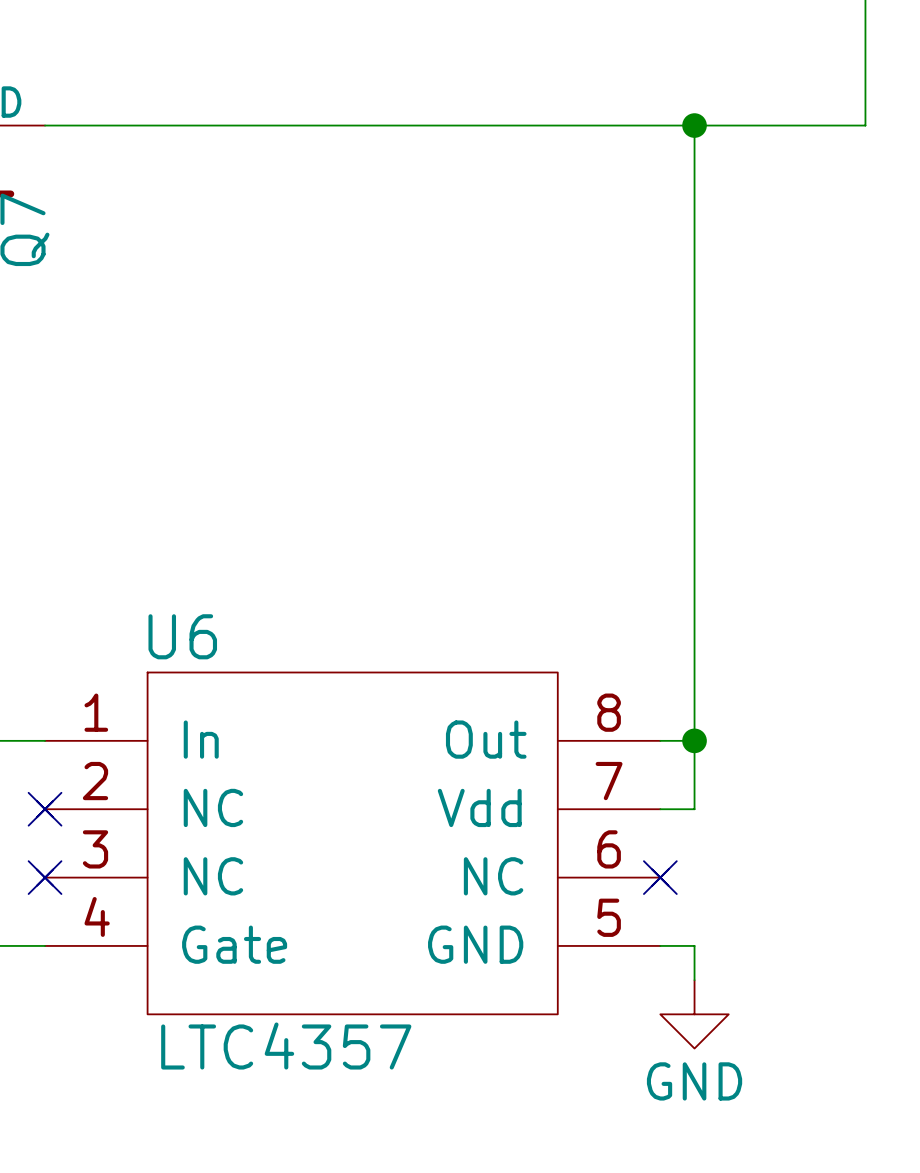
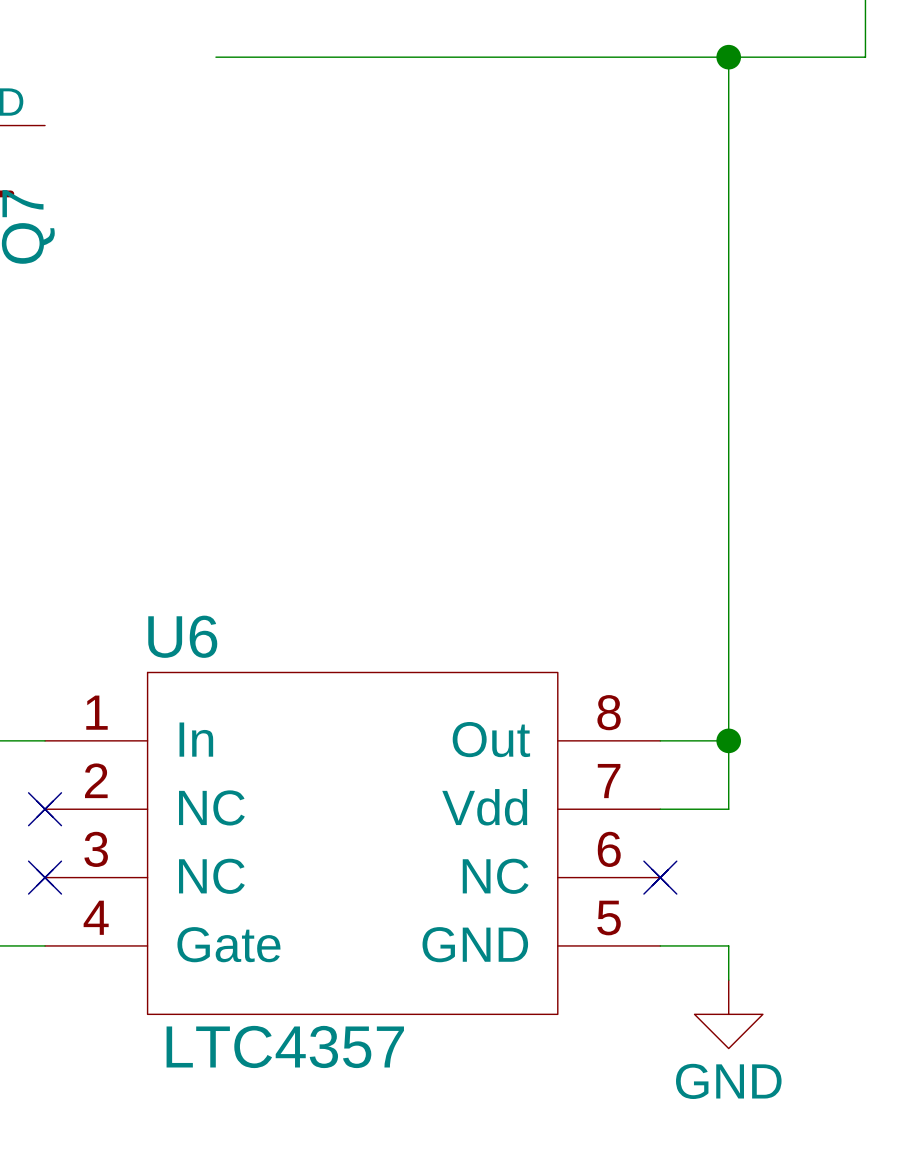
wire: (865, 57) (865, 125) (45, 125) -> (865, 57) (215, 57)
wire: (694, 125) (694, 809) -> (728, 57) (728, 809) (694, 809)
junction position: (694, 125) -> (728, 57)
wire: none -> (694, 740) (728, 740)
junction position: (694, 740) -> (728, 740)
wire: (694, 945) (694, 980) -> (694, 945) (728, 945) (728, 980)
power symbol position: GND (694, 1014) -> GND (728, 1014)

